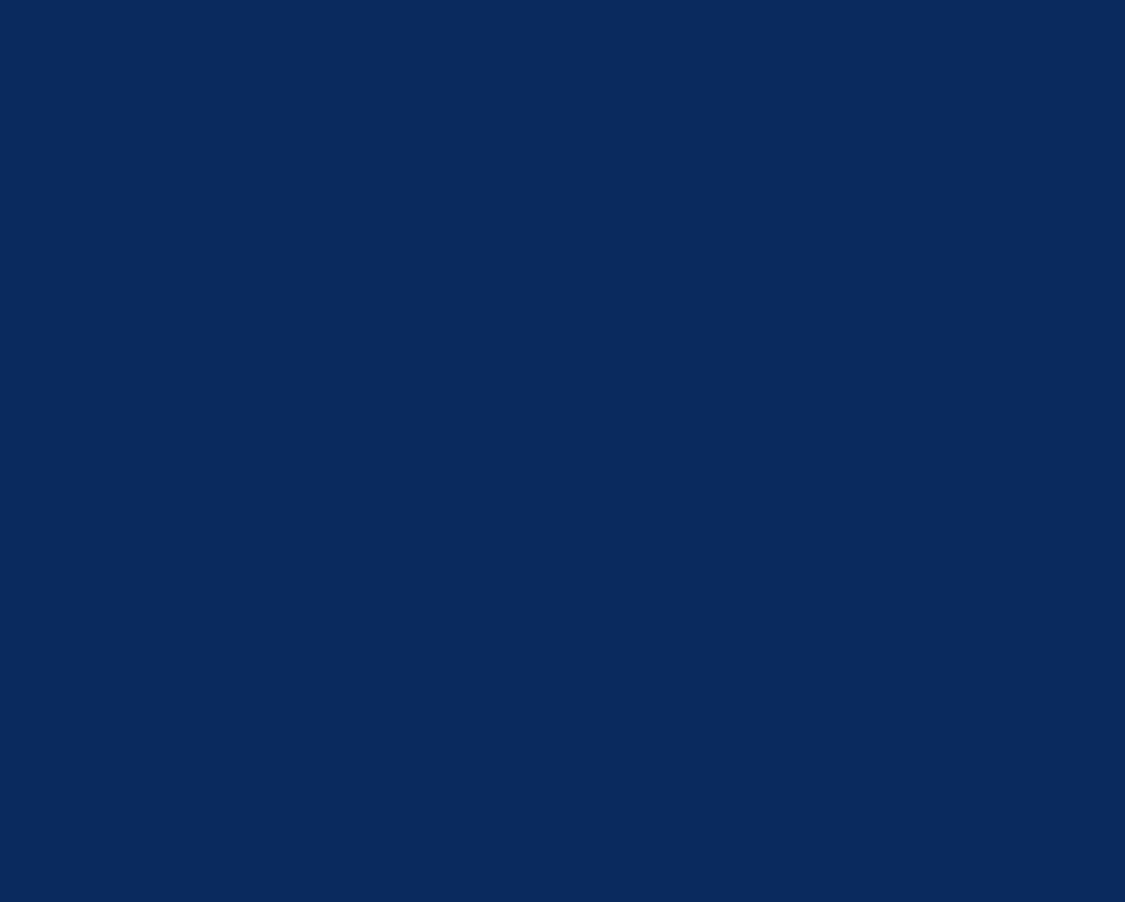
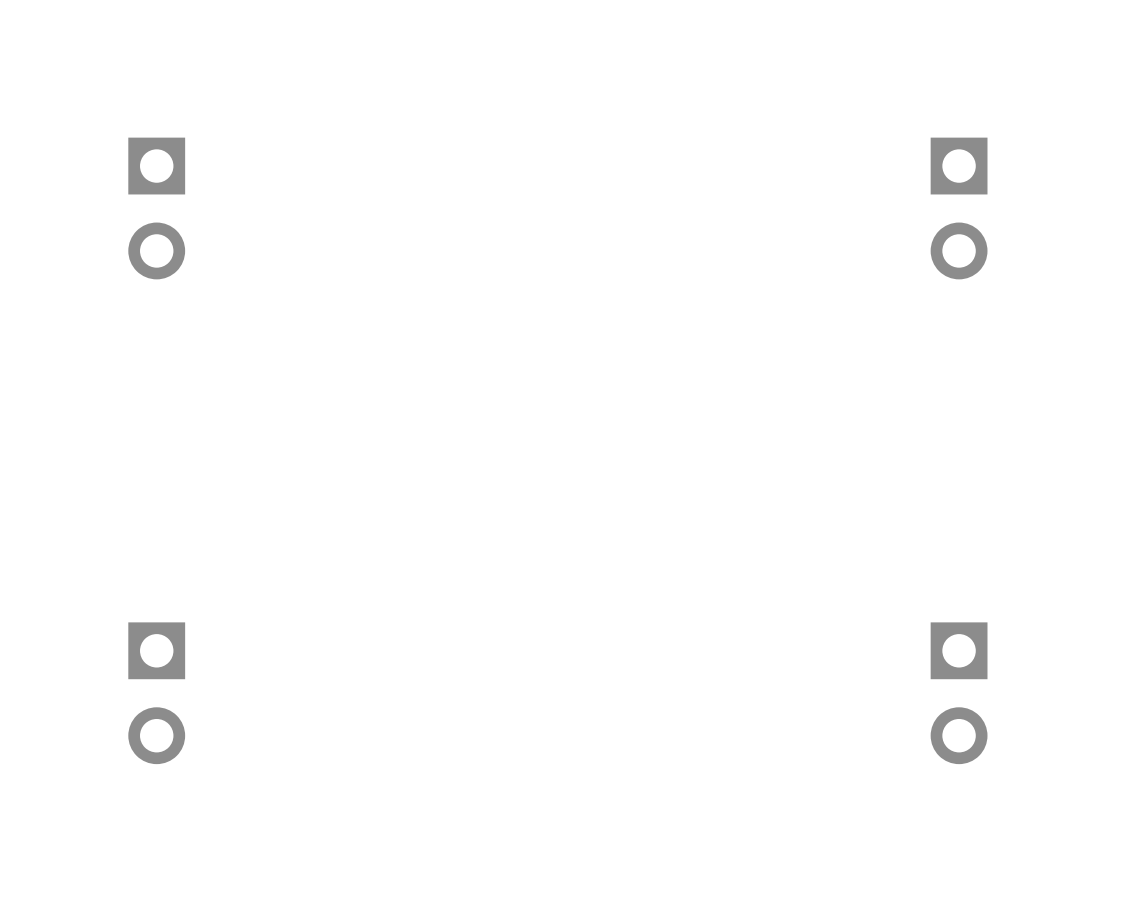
part: none -> (156, 208)
part: none -> (959, 208)
part: none -> (156, 693)
part: none -> (959, 693)

